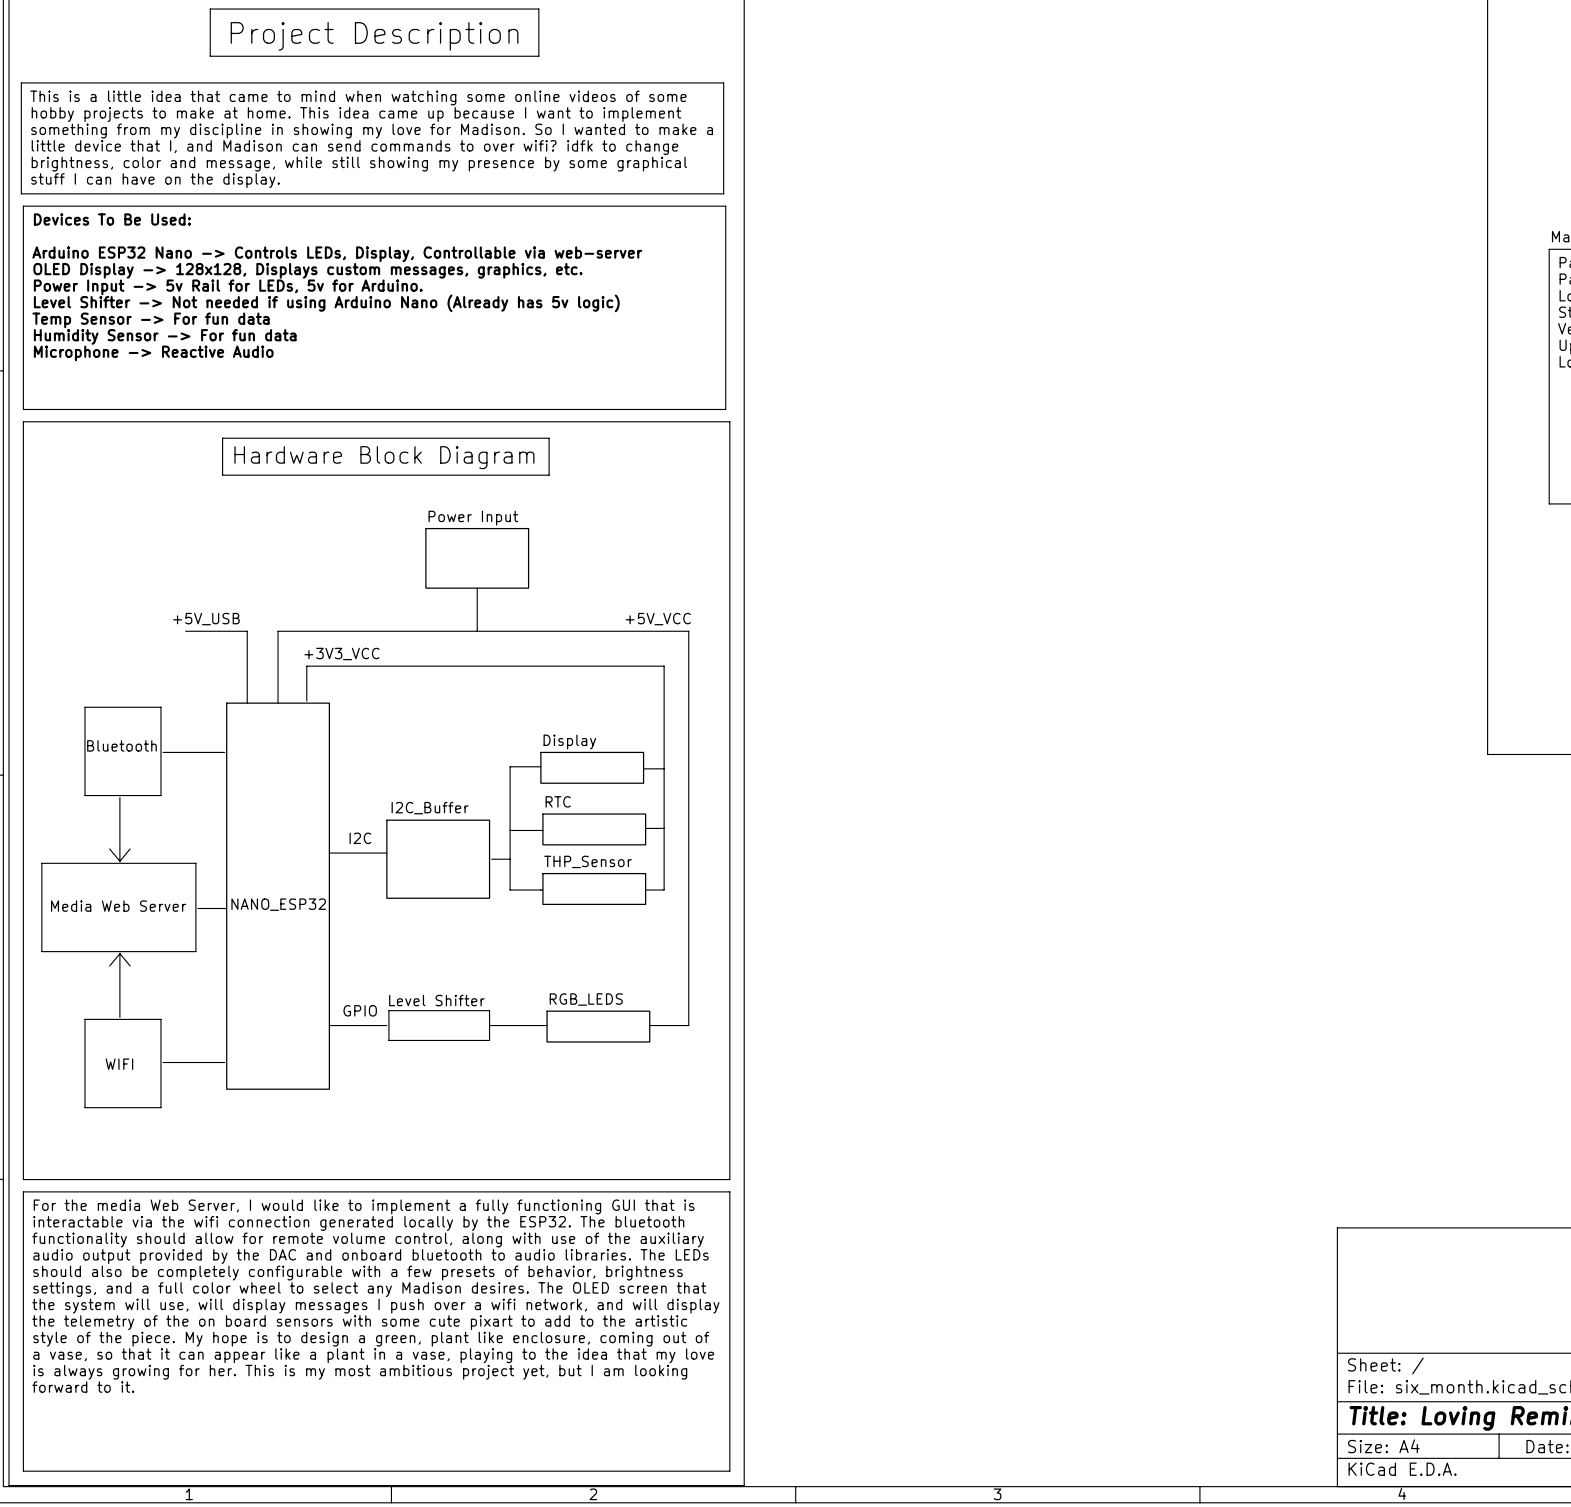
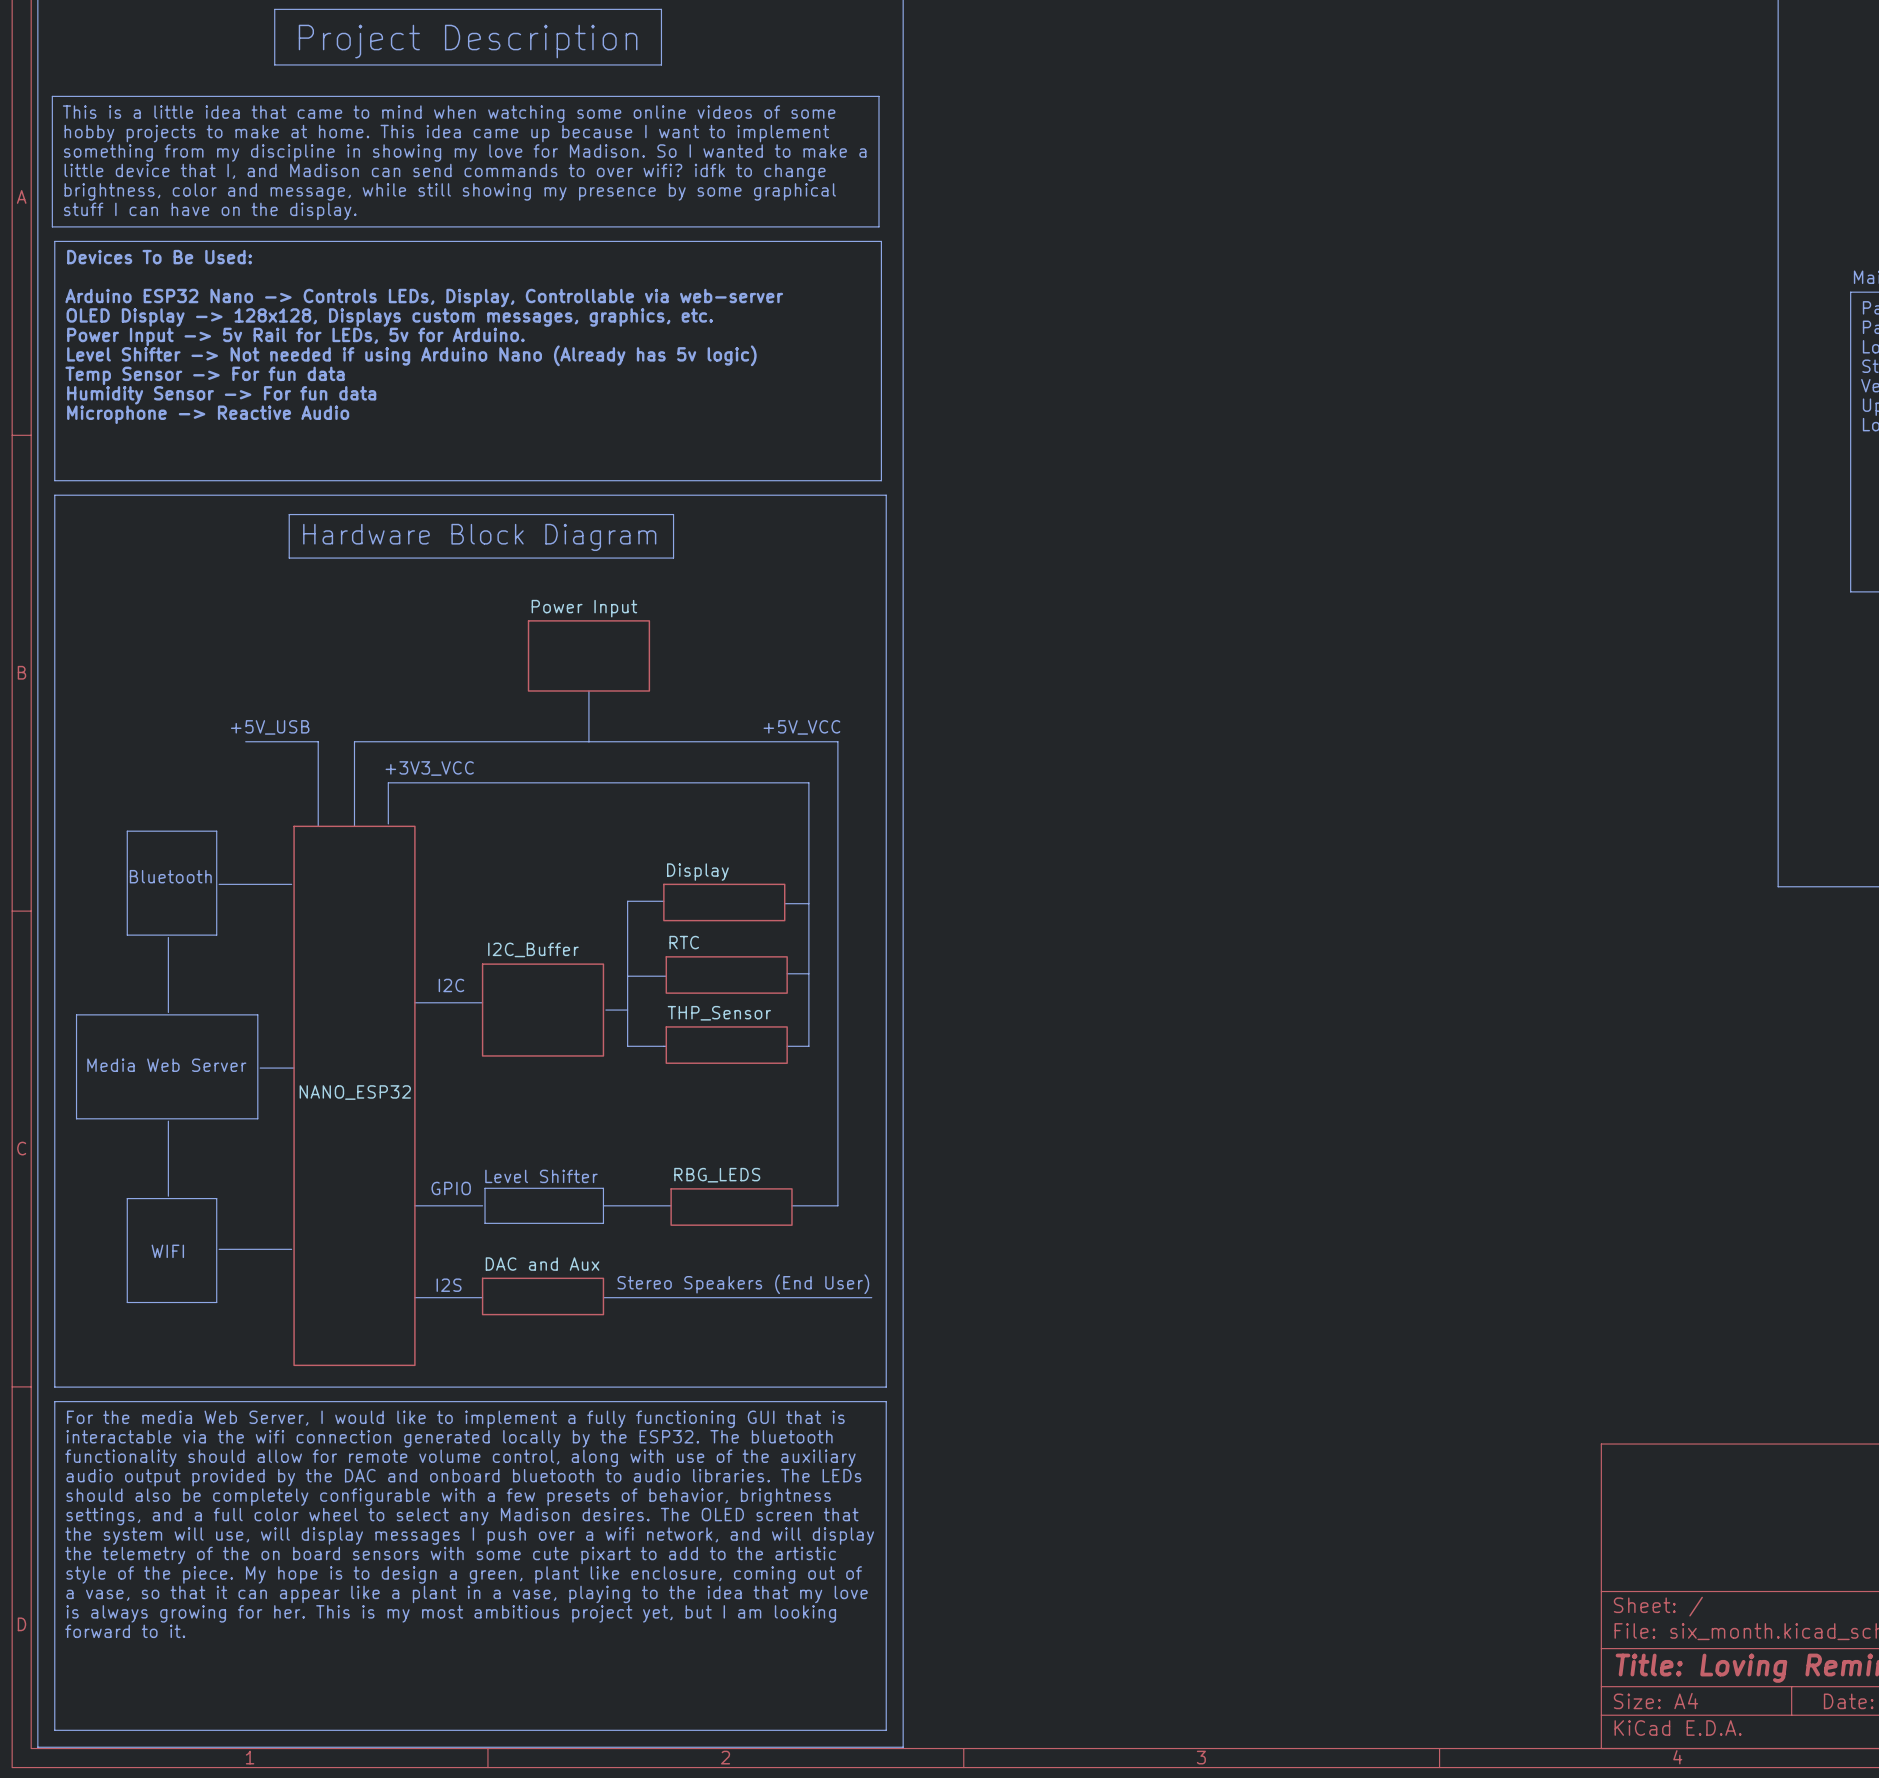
sheet NANO_ESP32 shape: [226, 702, 330, 1090] -> [293, 825, 416, 1367]
line: (109, 848) (119, 861) (130, 848) -> none
line: (109, 965) (119, 953) (130, 965) -> none
sheet RGB_LEDS name: RGB_LEDS (586, 999) -> RBG_LEDS (717, 1175)
text: none -> I2S (449, 1285)
text: none -> Stereo Speakers (End User) (743, 1284)
sheet DAC and Aux: none -> (543, 1296)
line: none -> (414, 1297) (482, 1297)
line: none -> (603, 1297) (871, 1297)

